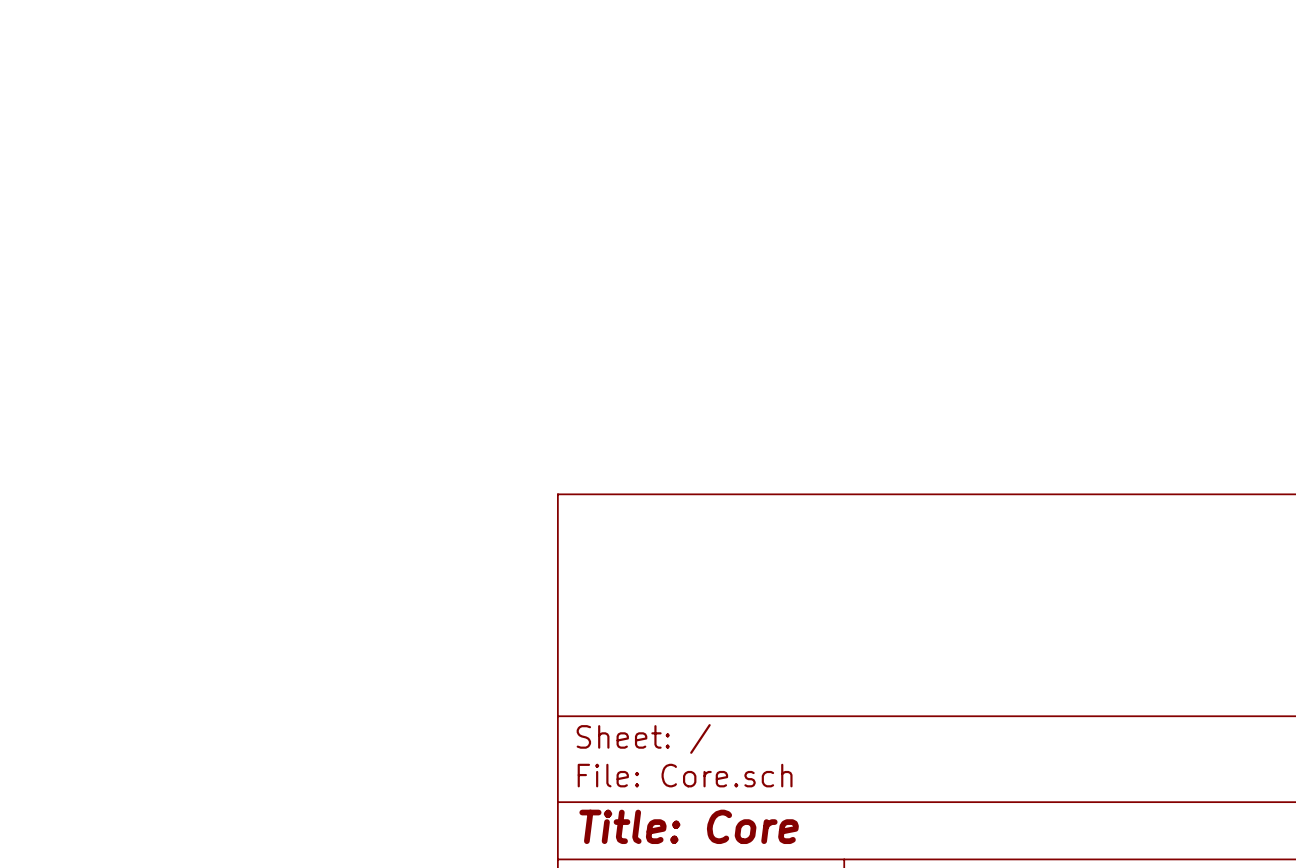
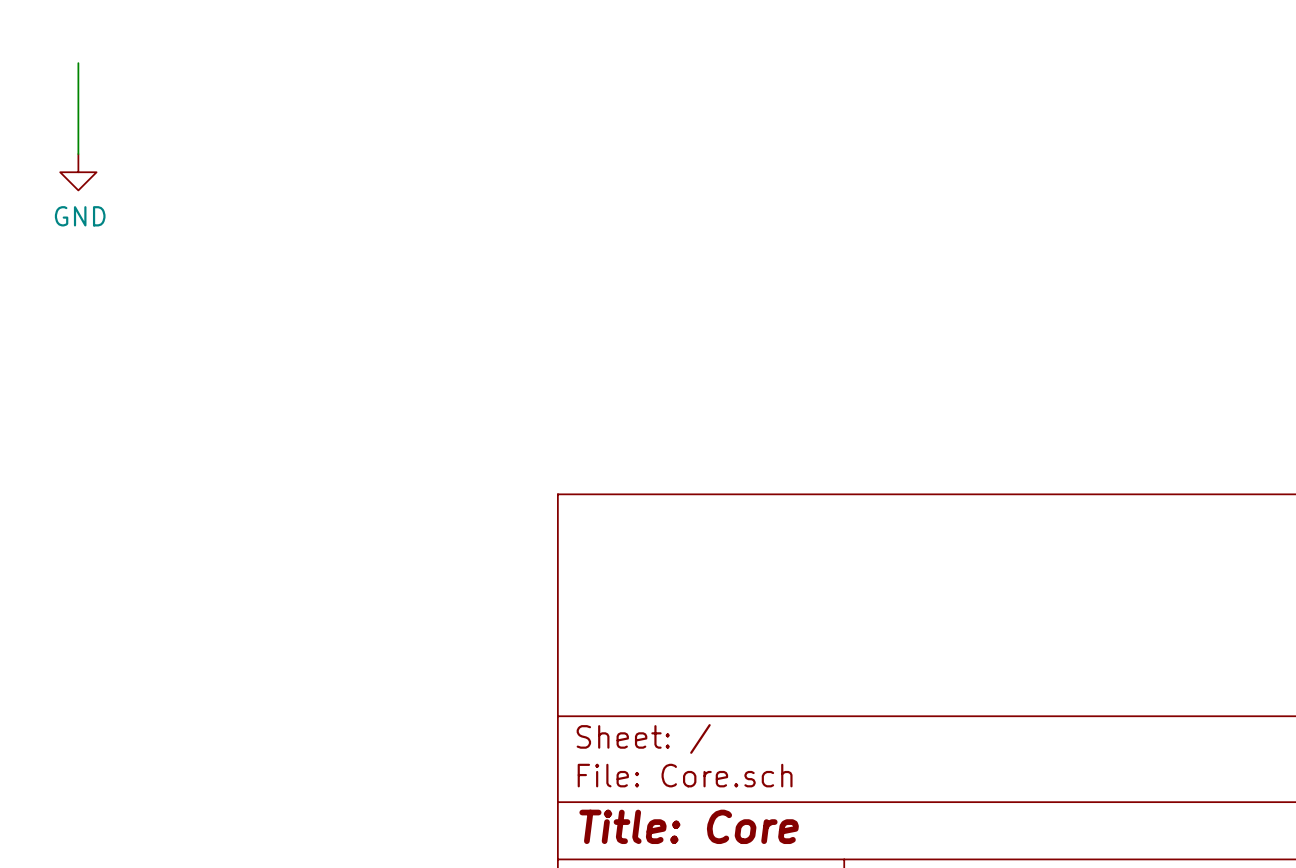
wire: none -> (78, 63) (78, 154)
power symbol: none -> GND (78, 172)

